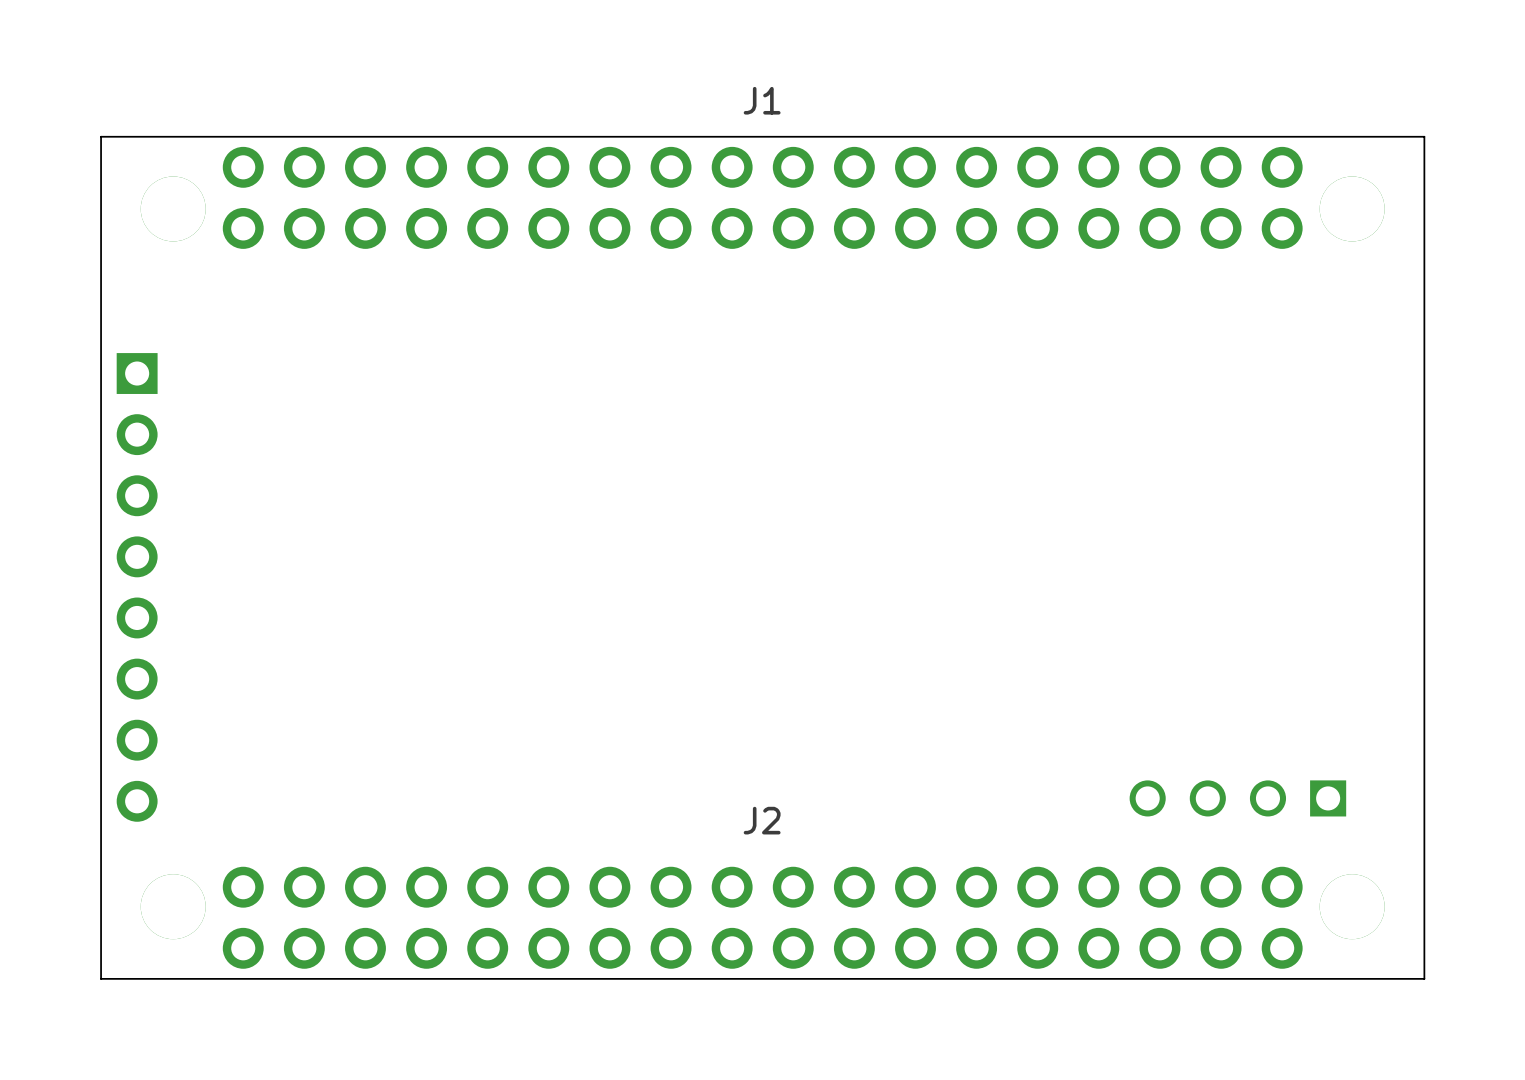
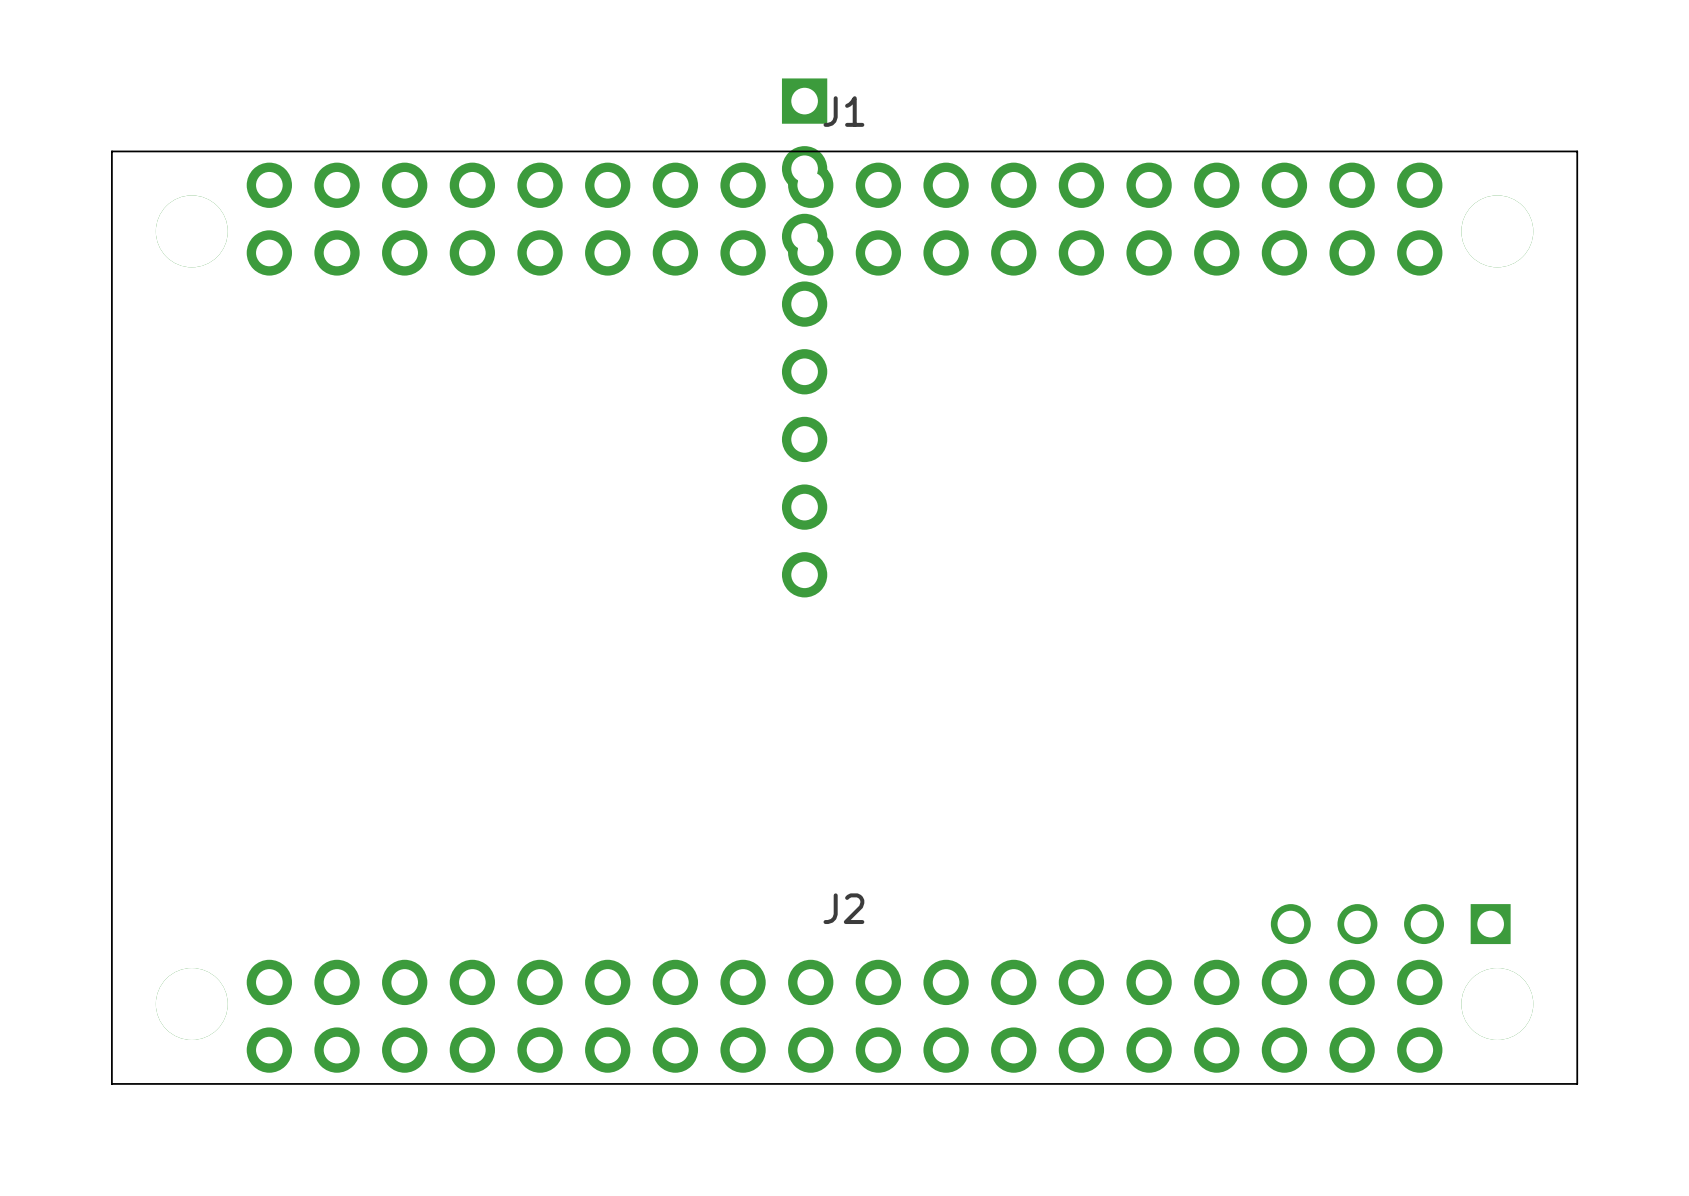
part: none -> (804, 337)
part: (137, 587) -> none
part position: (1237, 798) -> (1390, 924)

